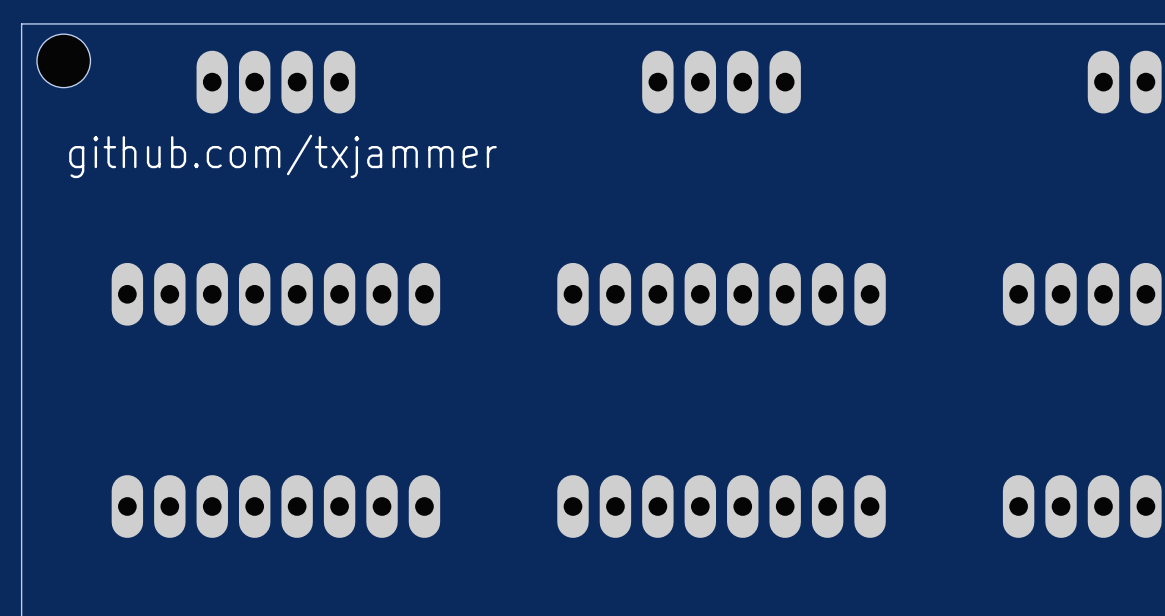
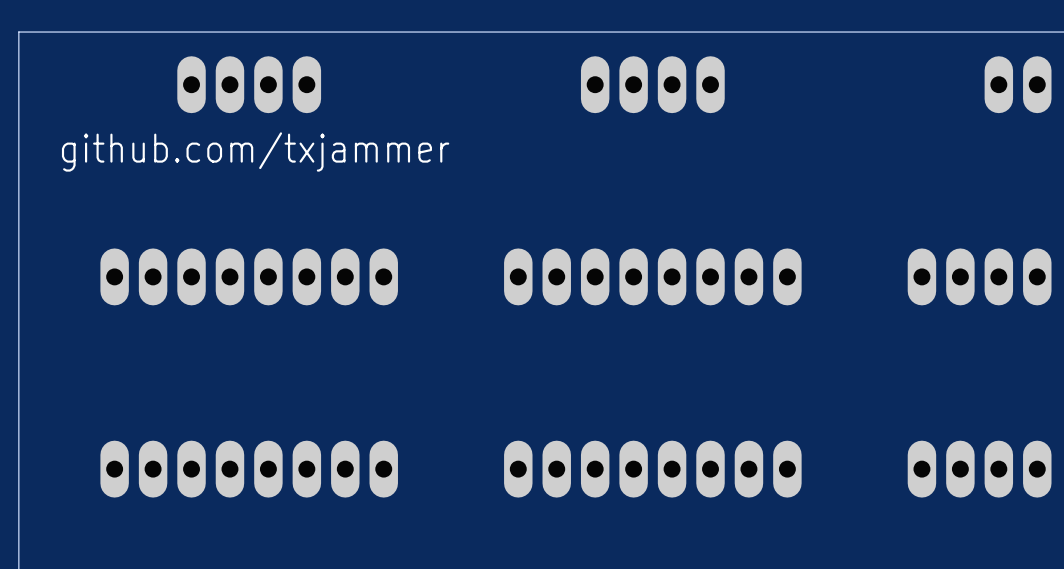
hole: (63, 60) -> none

